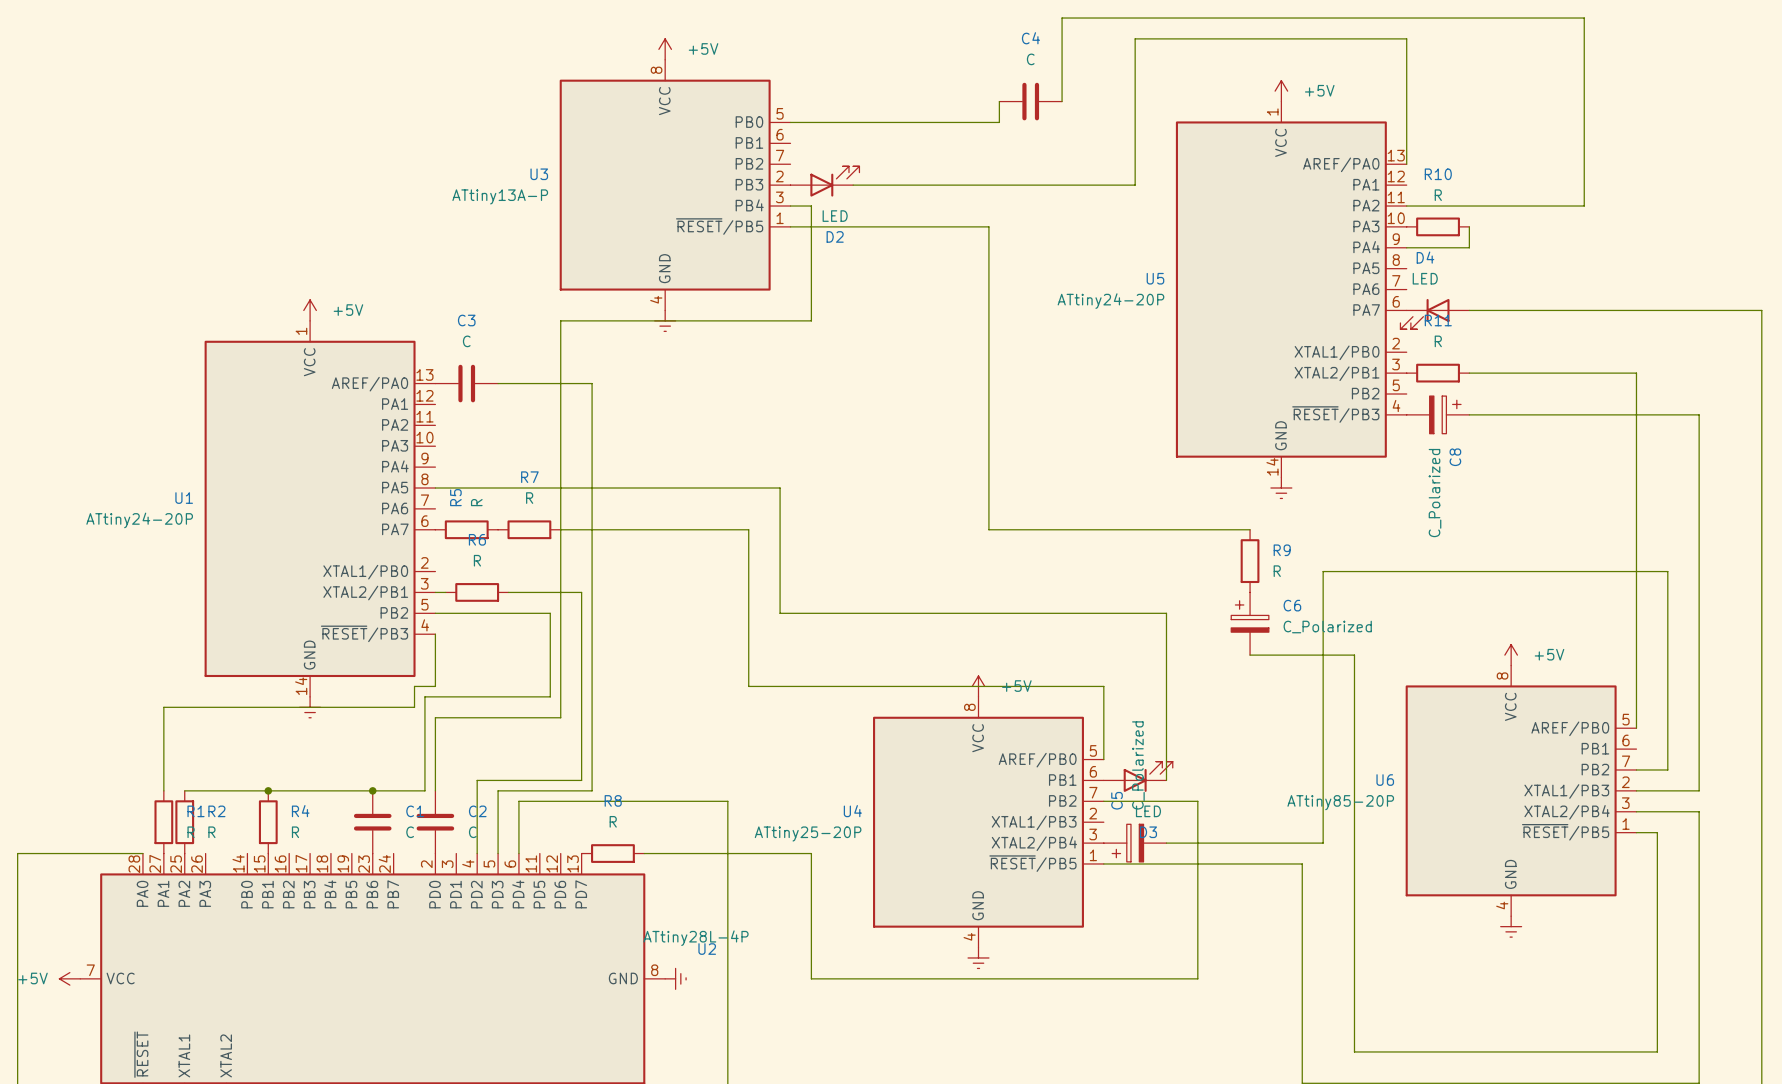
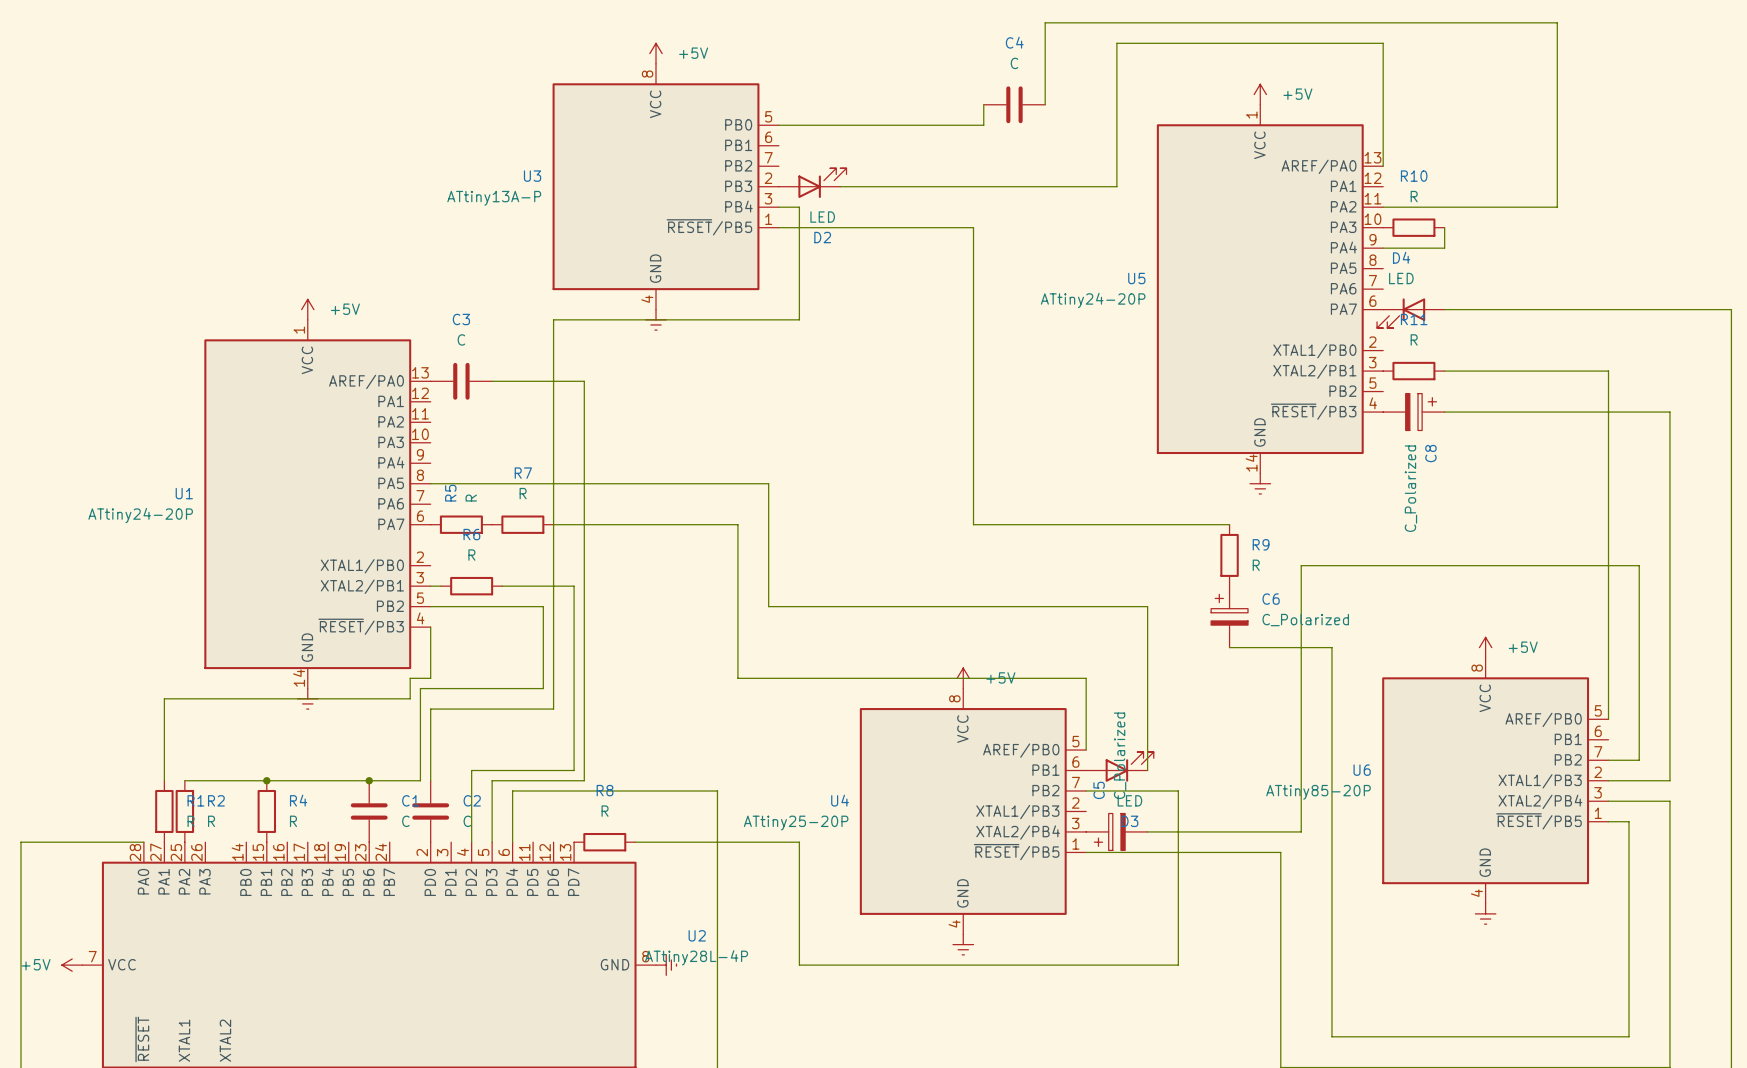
U2 value position: ATtiny28L-4P (696, 938) -> ATtiny28L-4P (696, 957)

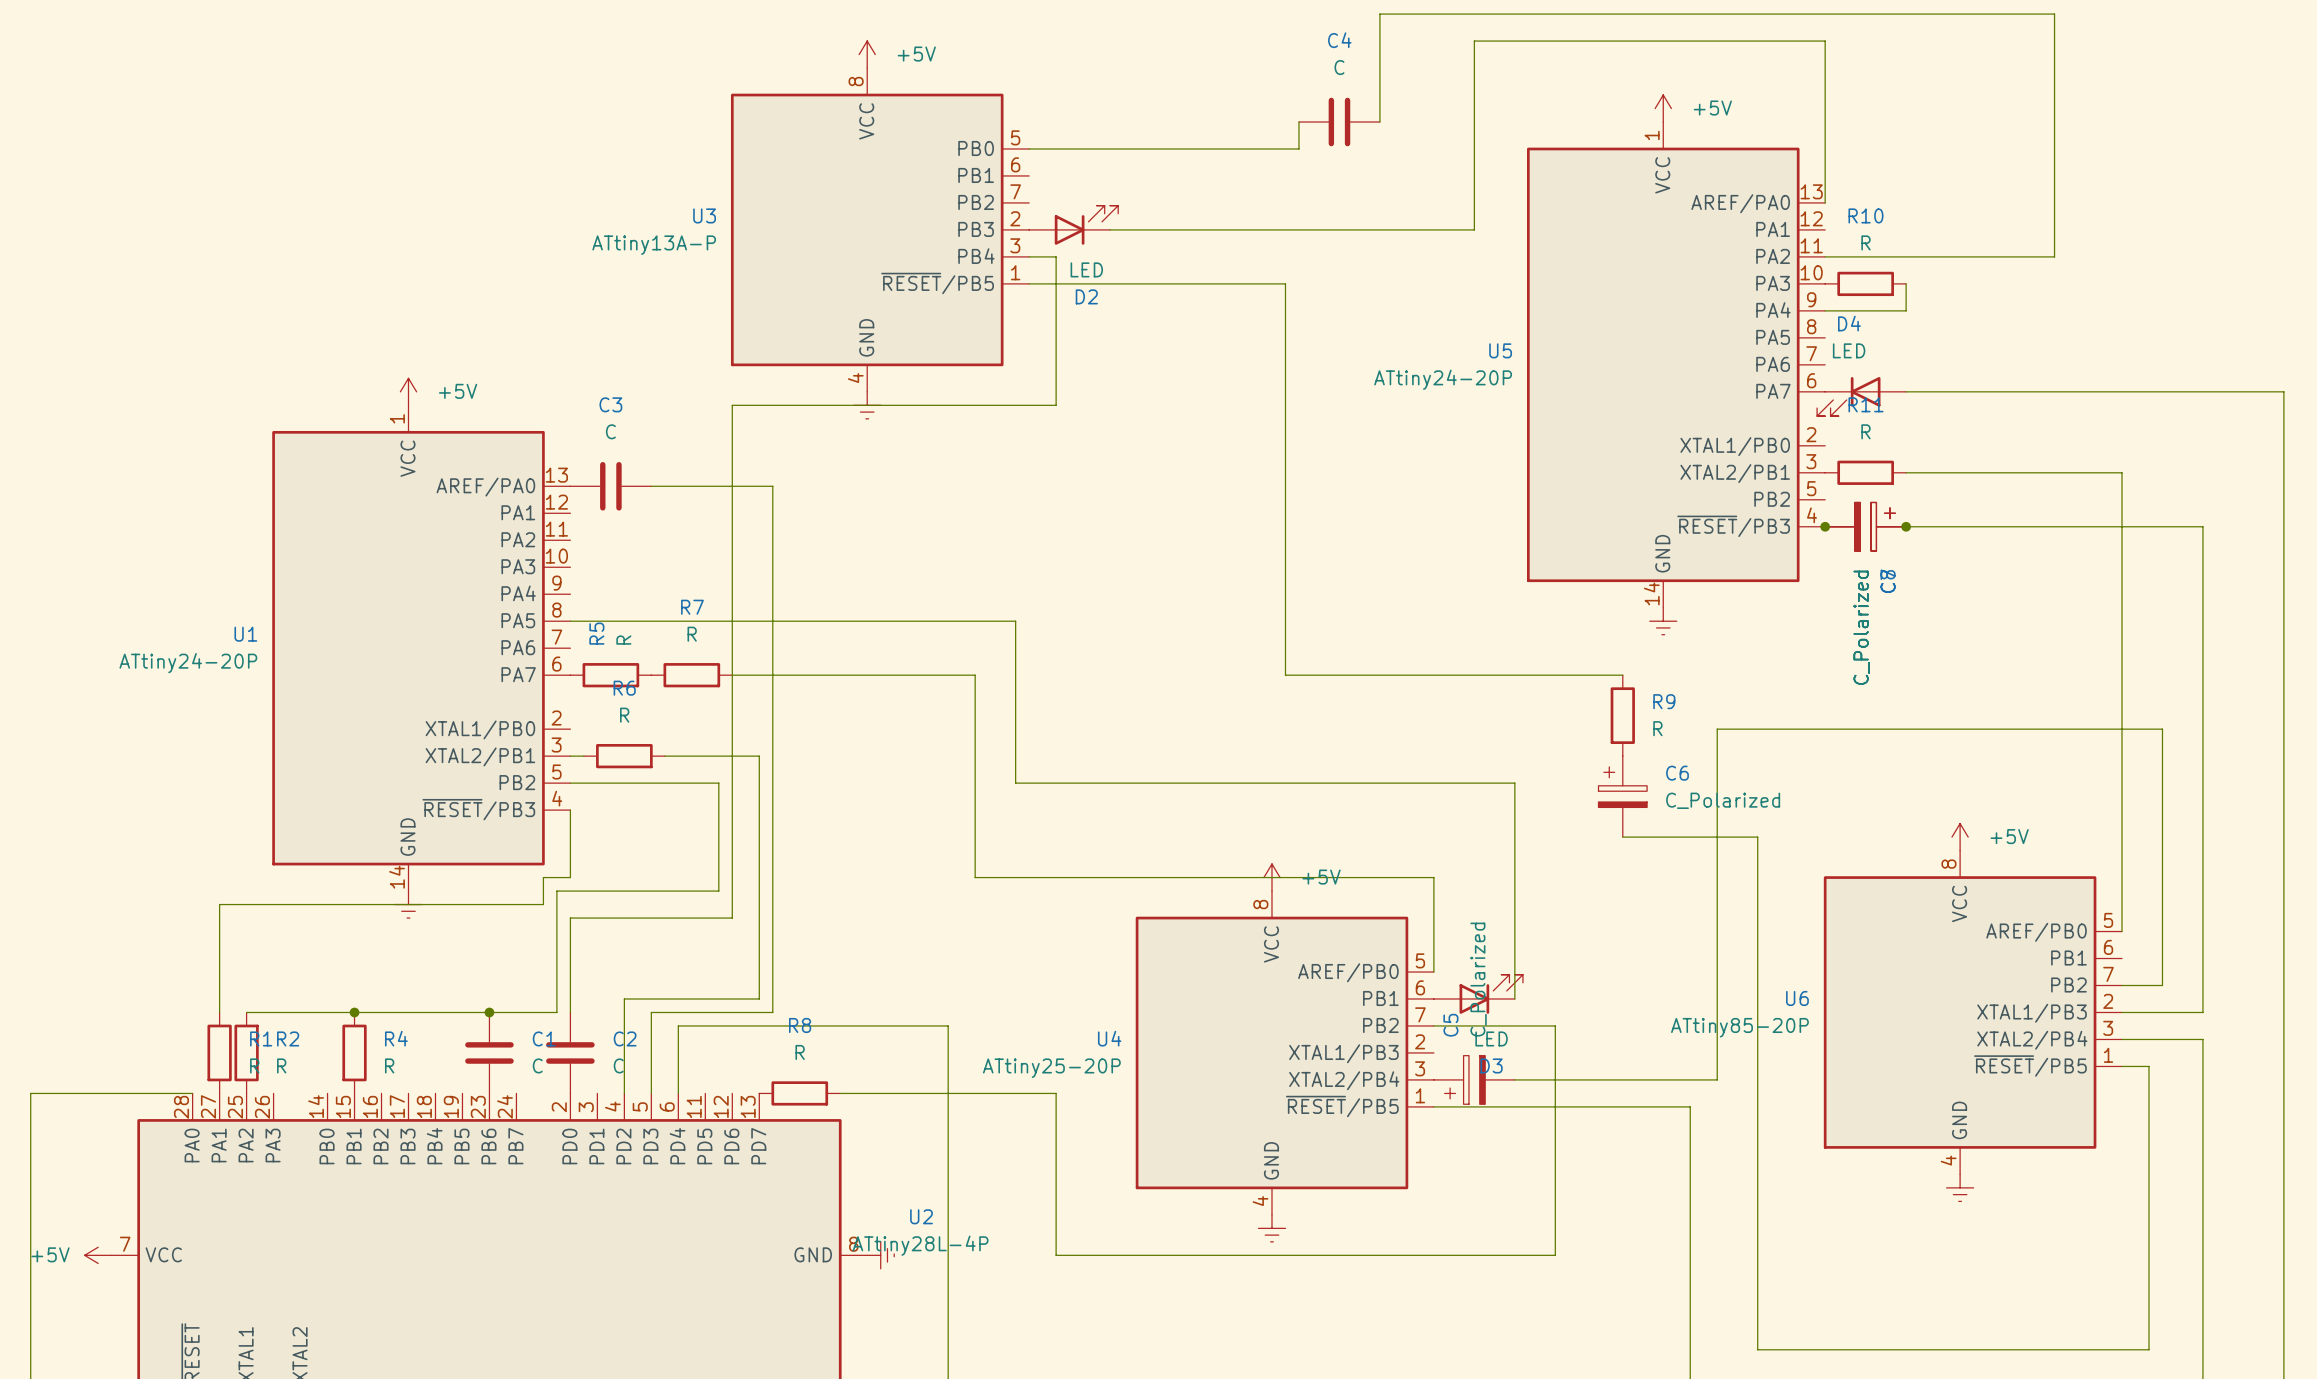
junction: none -> (1825, 526)
part: none -> C_Polarized (1865, 526)
junction: none -> (1906, 526)

